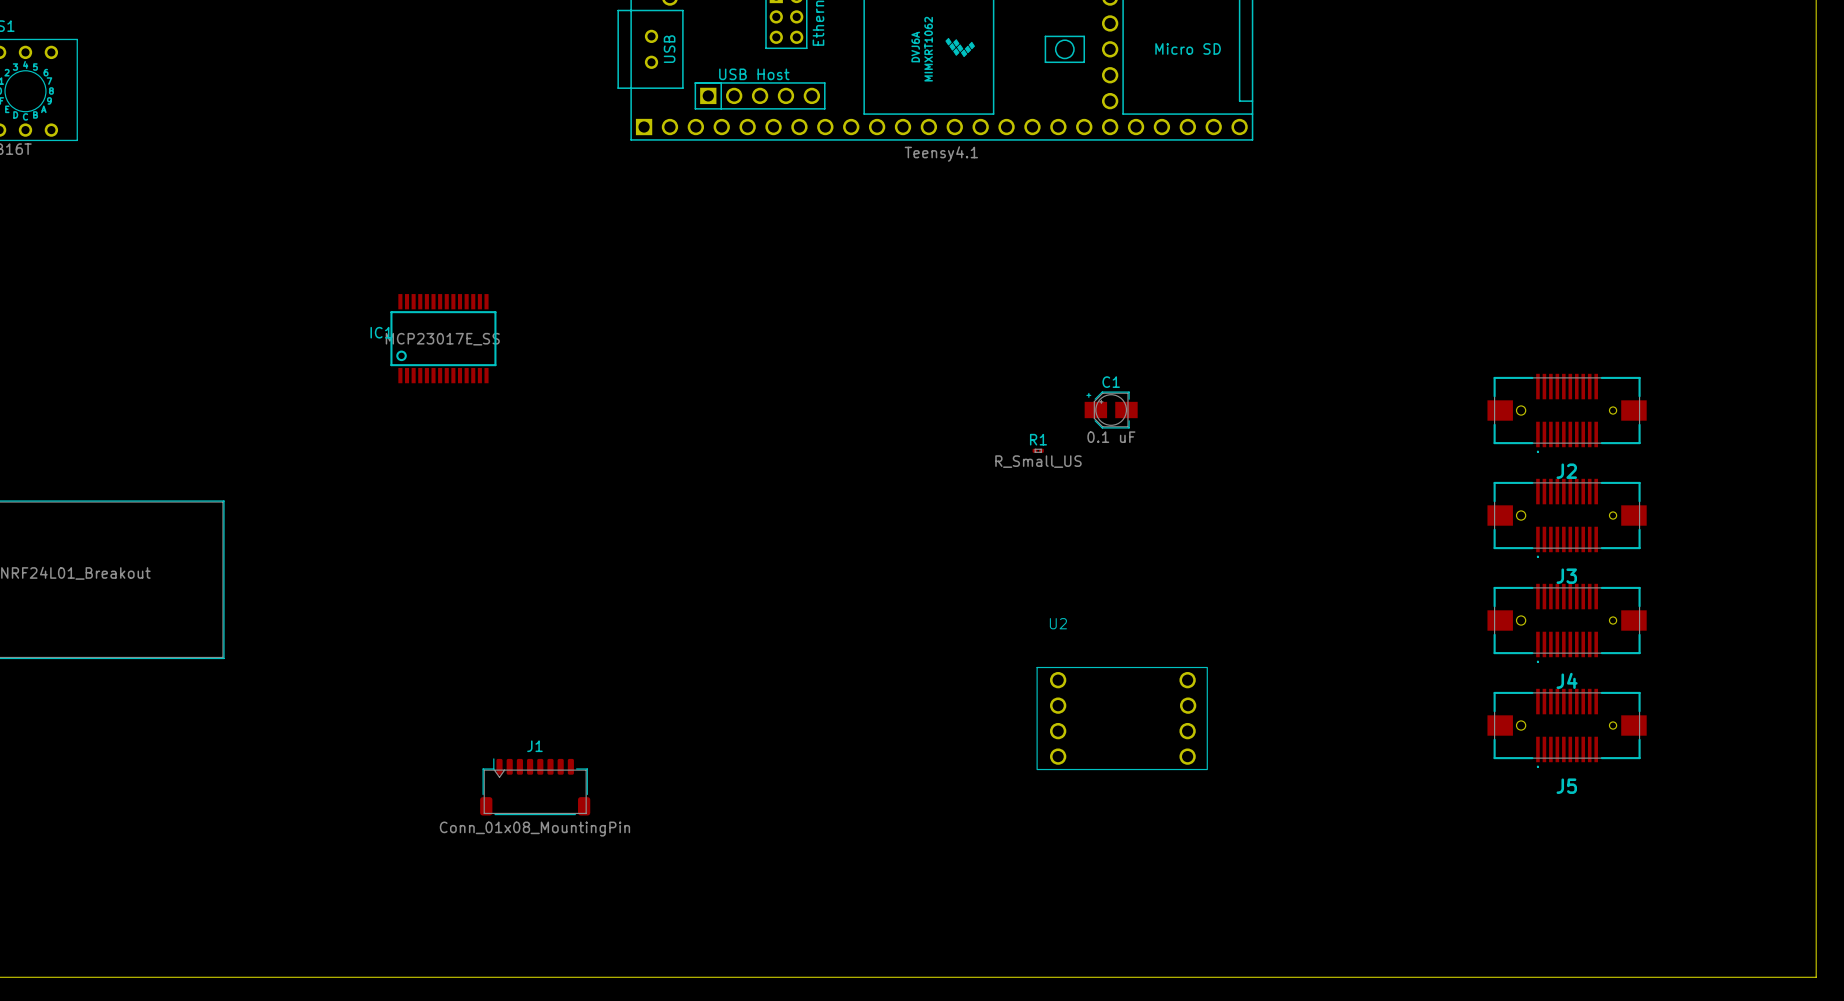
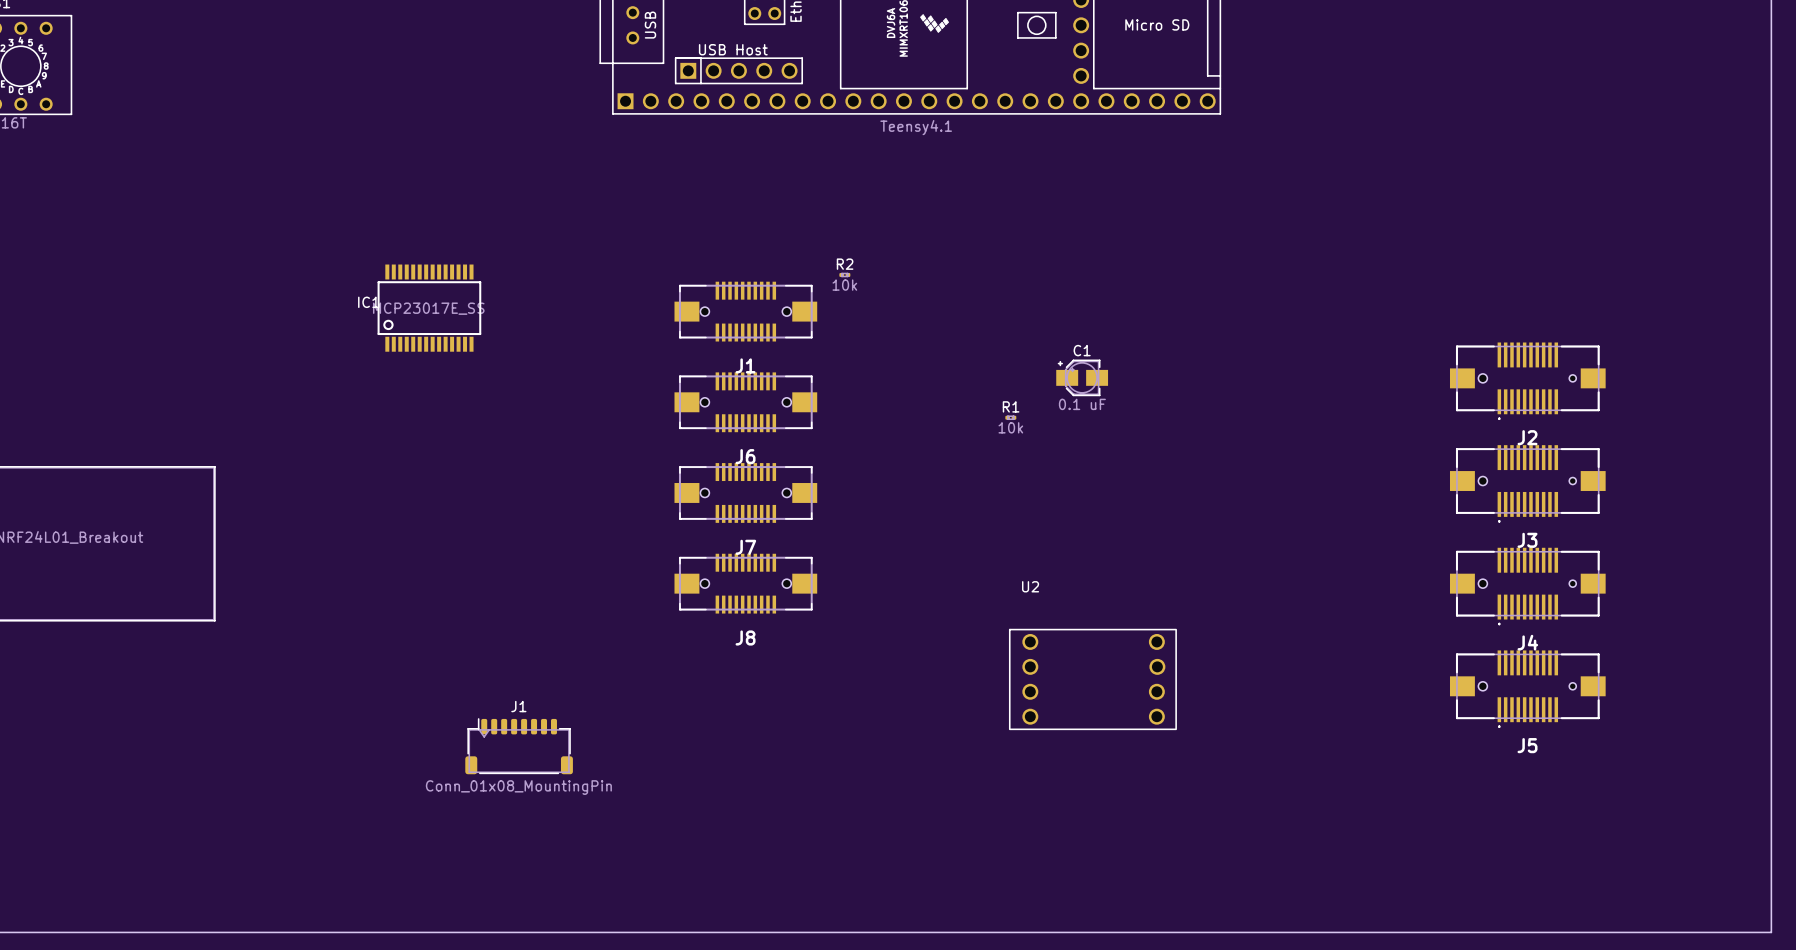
R2: none -> 10k (844, 274)
J1: none -> (745, 311)
J6: none -> (745, 402)
R1 value: R_Small_US (1038, 461) -> 10k (1010, 427)
J7: none -> (745, 492)
J8: none -> (745, 583)

